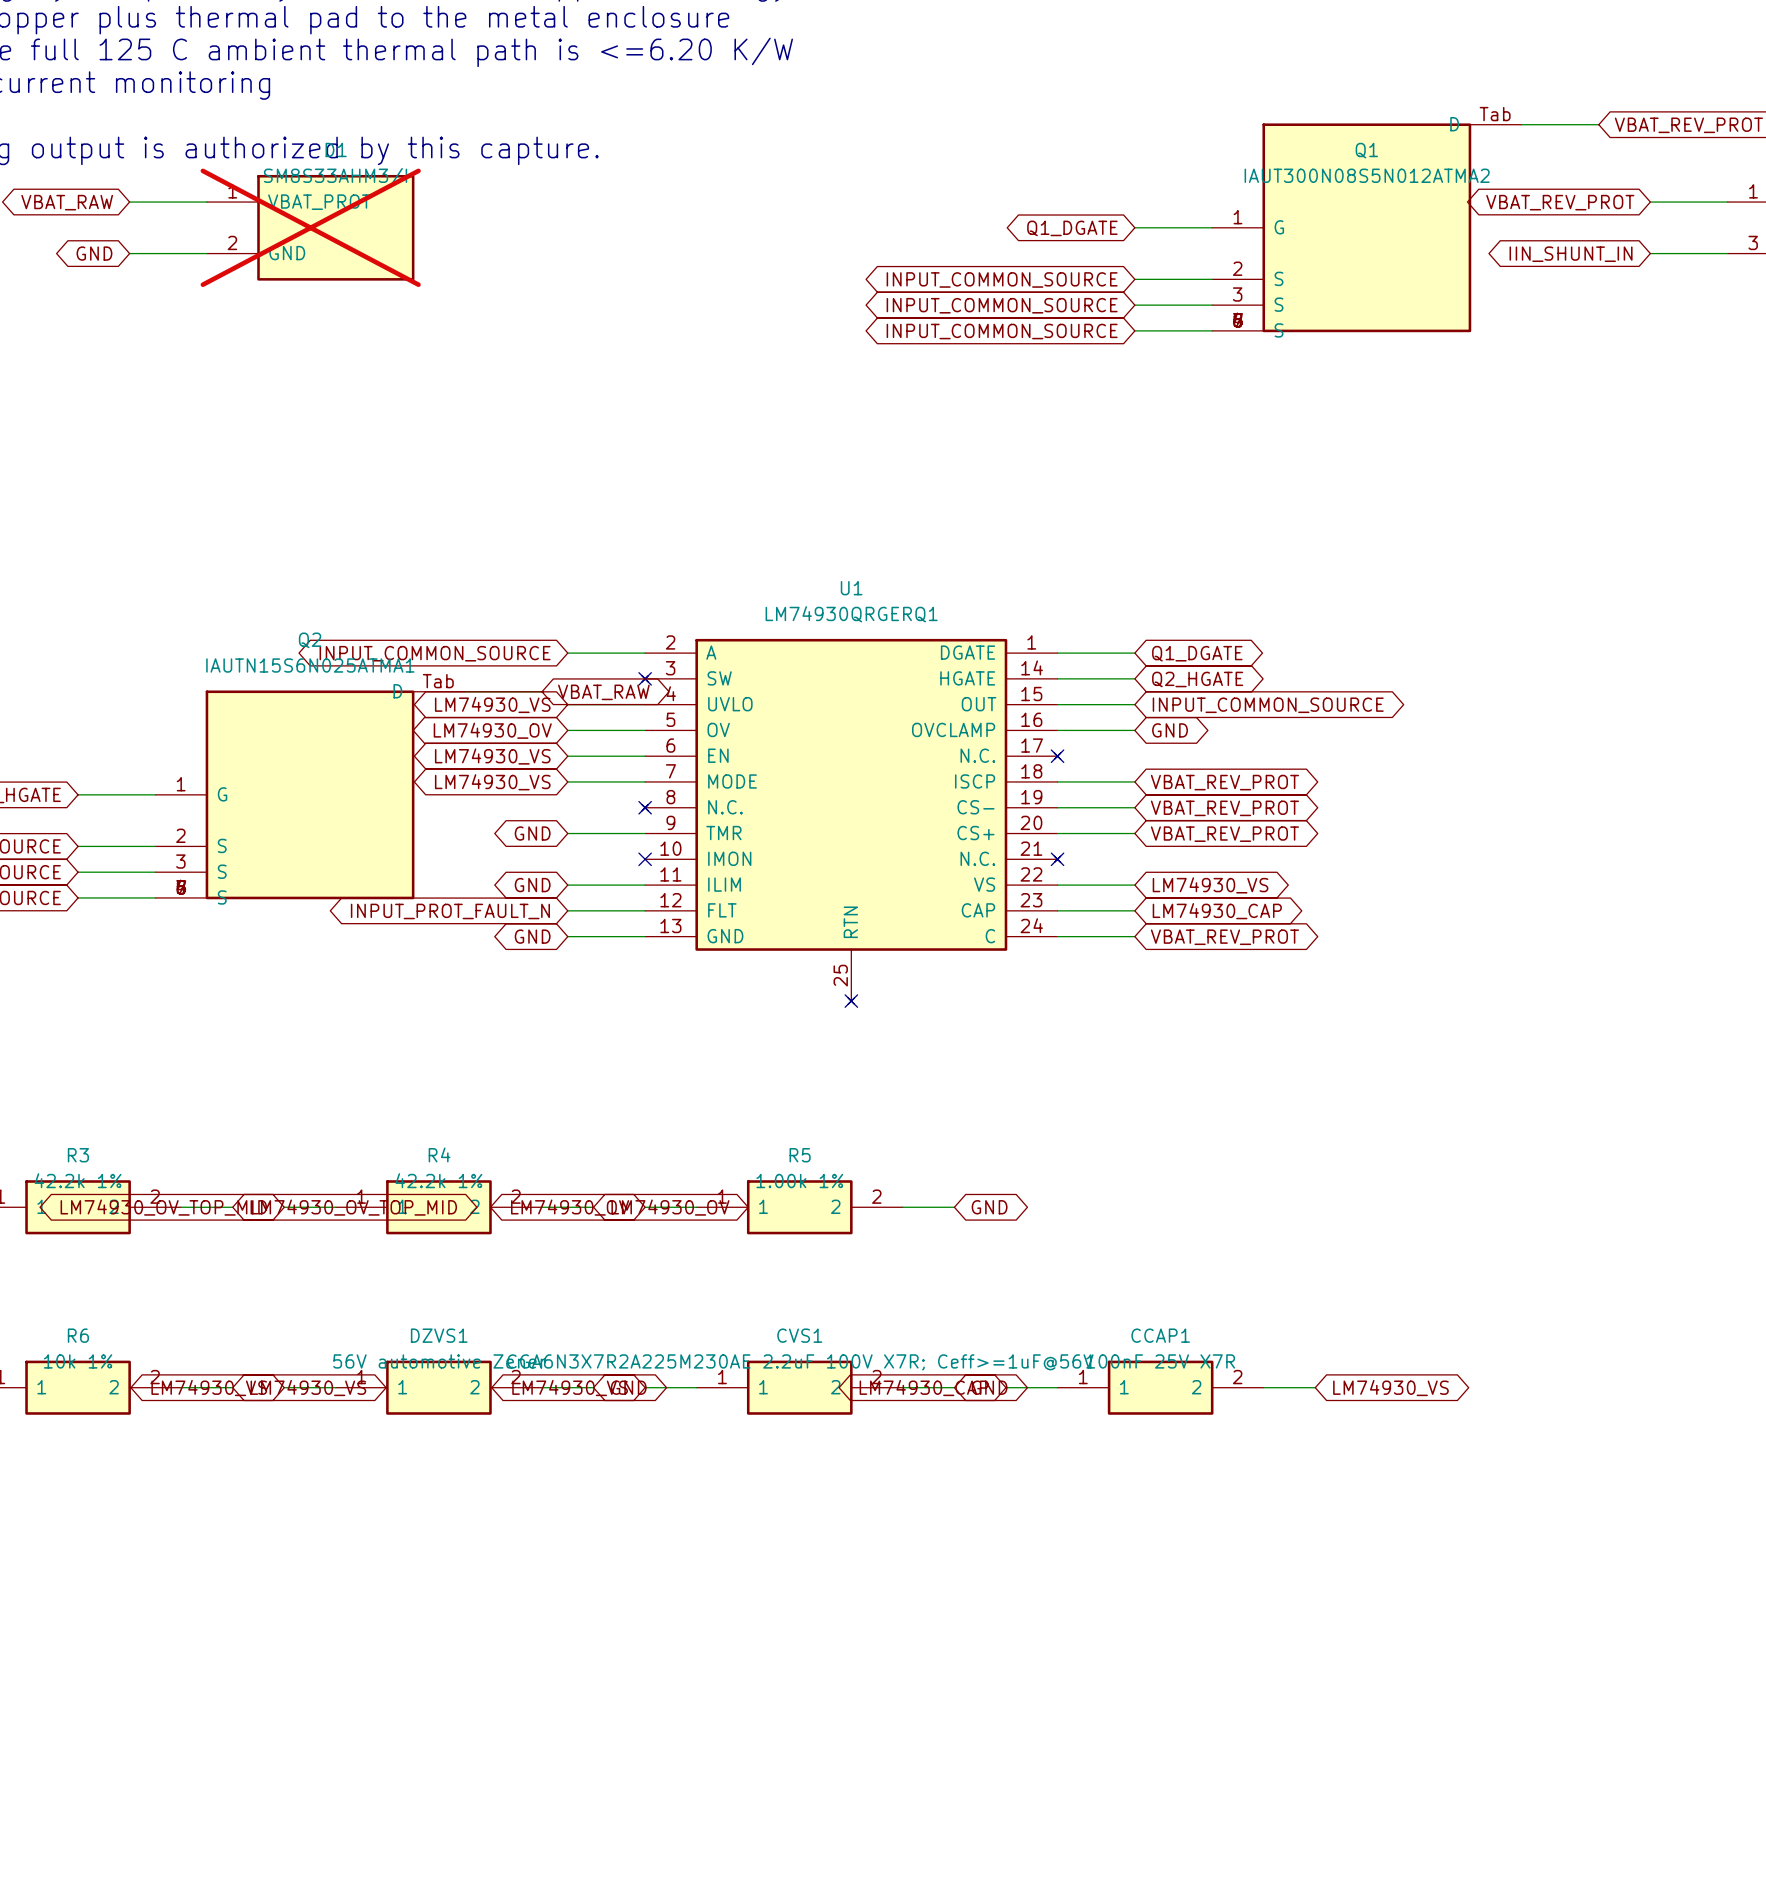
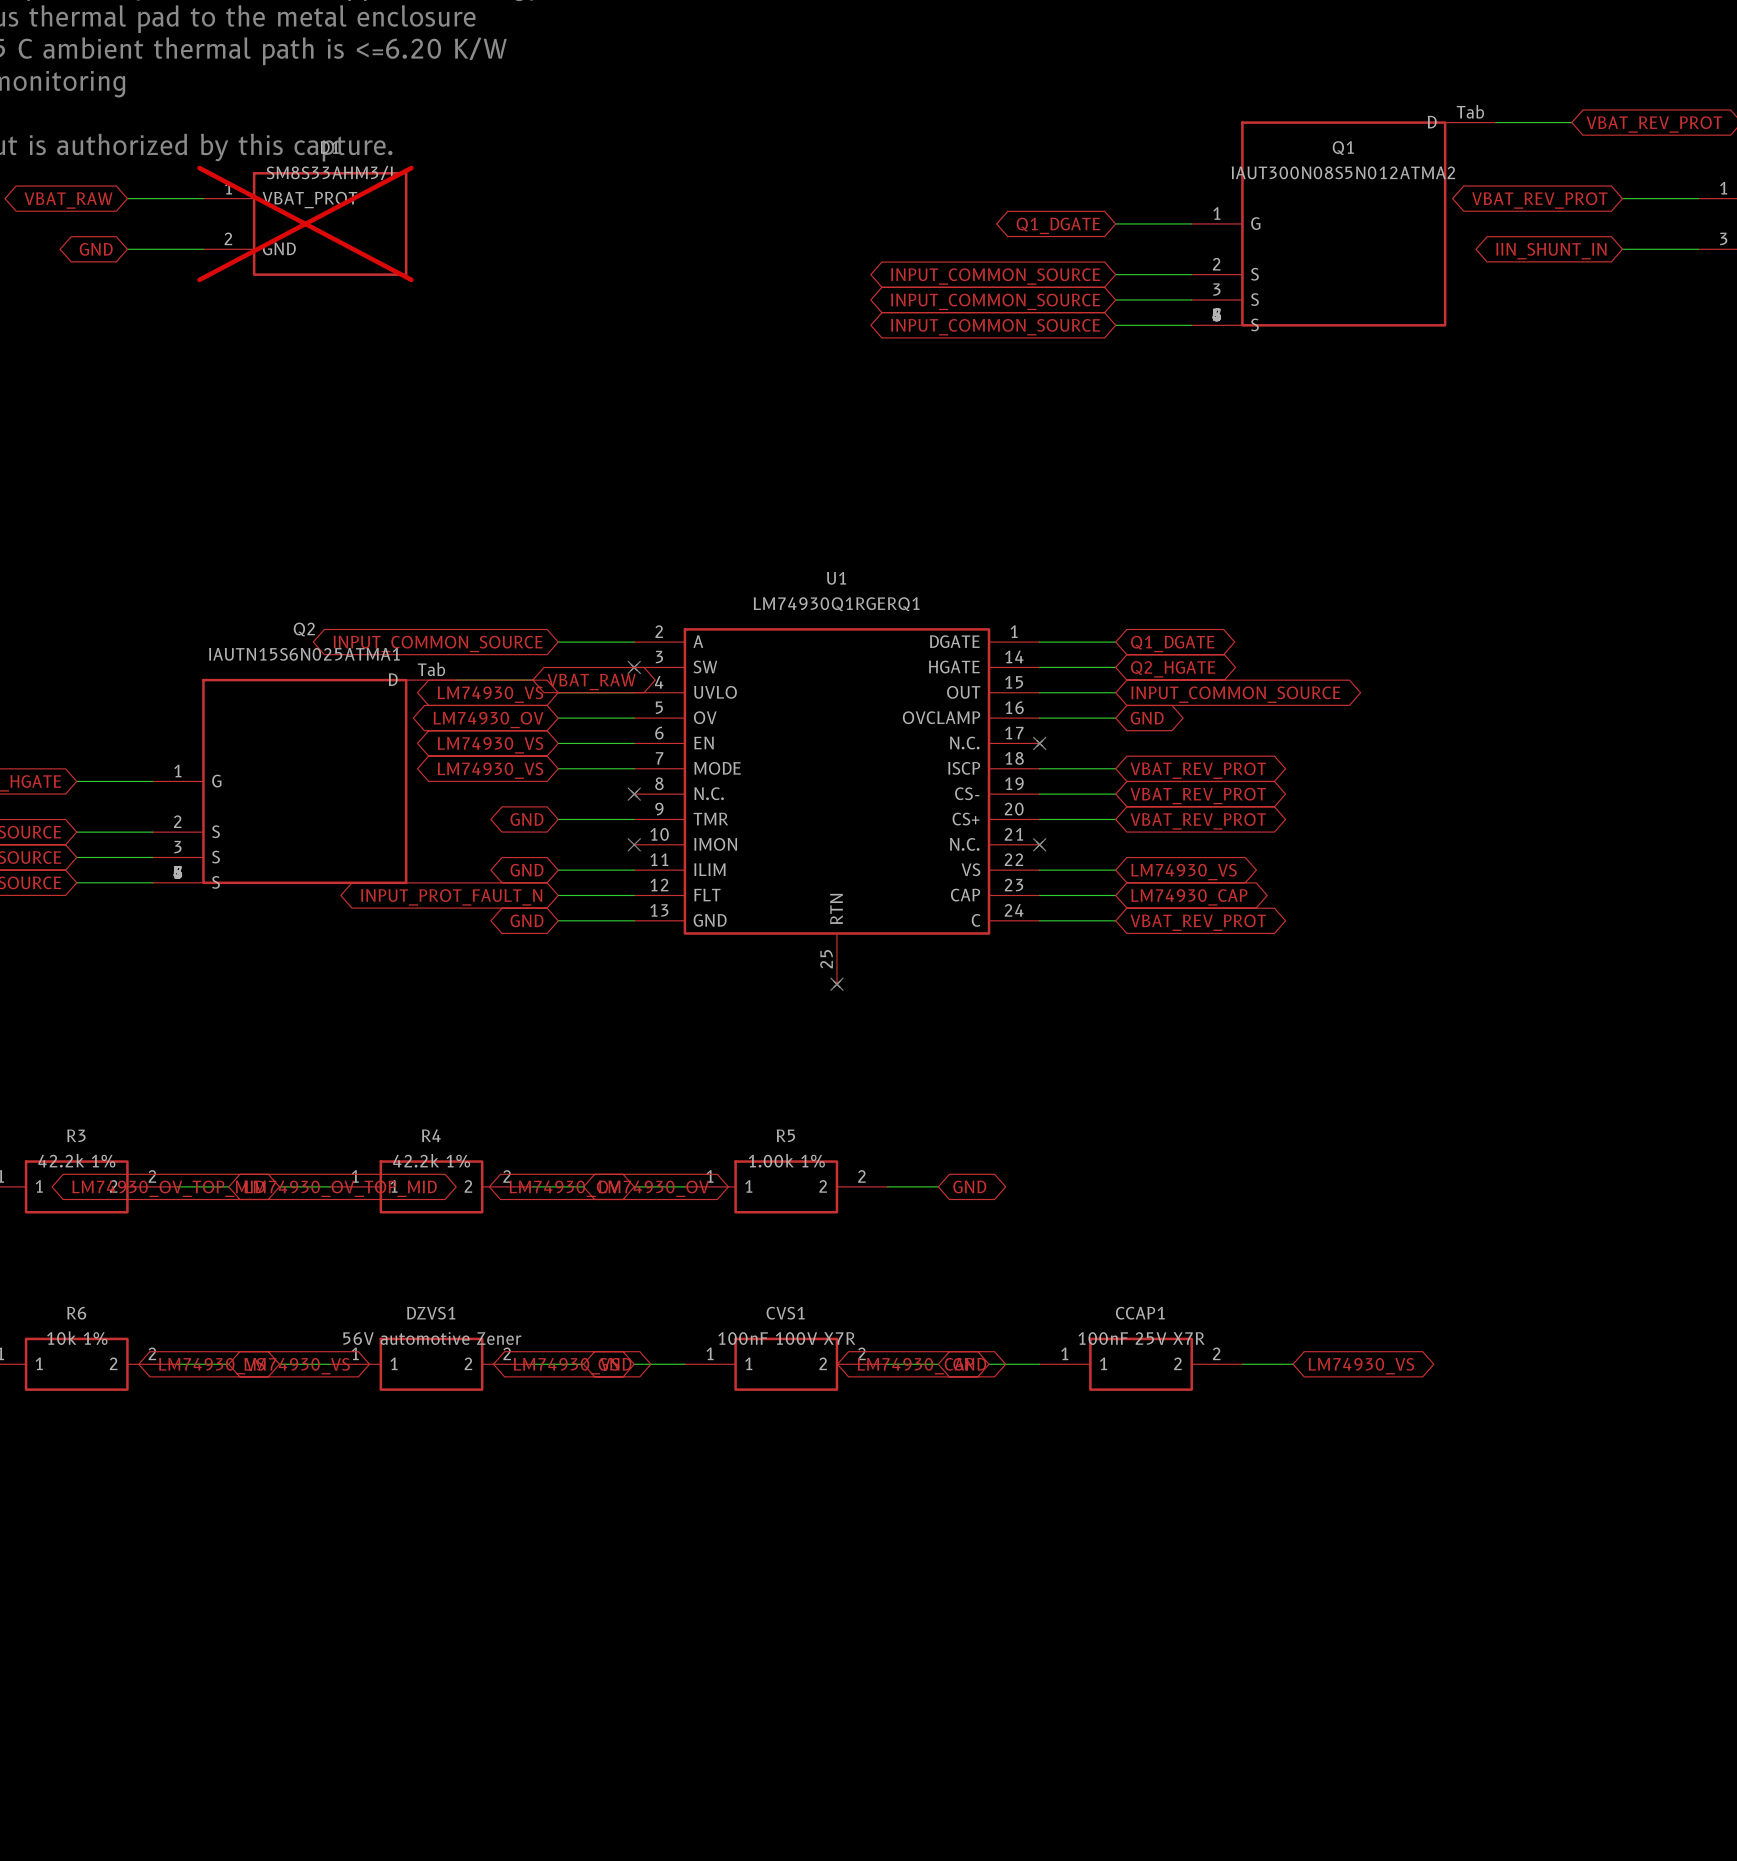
U1 value: LM74930QRGERQ1 (851, 614) -> LM74930Q1RGERQ1 (836, 604)
CVS1 value: CGA6N3X7R2A225M230AE 2.2uF 100V X7R; Ceff>=1uF@56V (800, 1362) -> 100nF 100V X7R (786, 1338)

